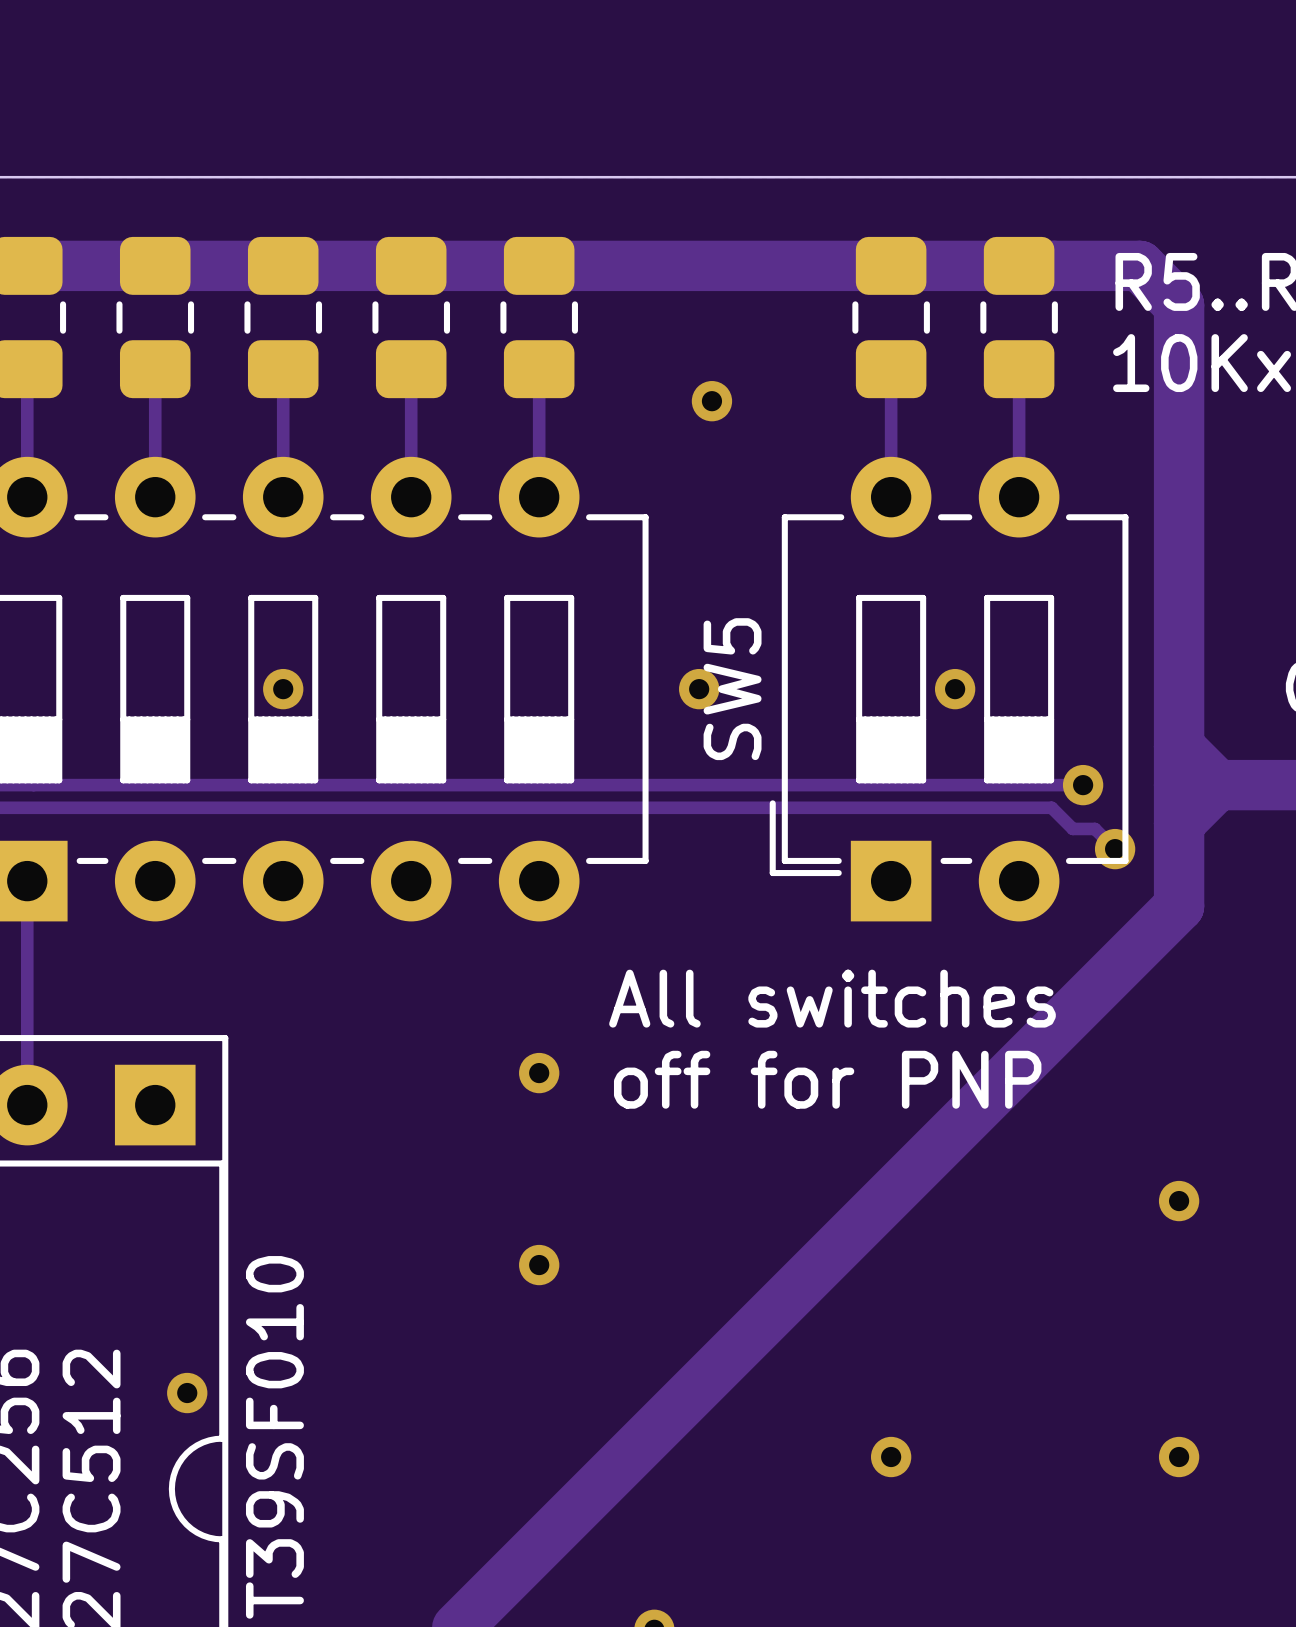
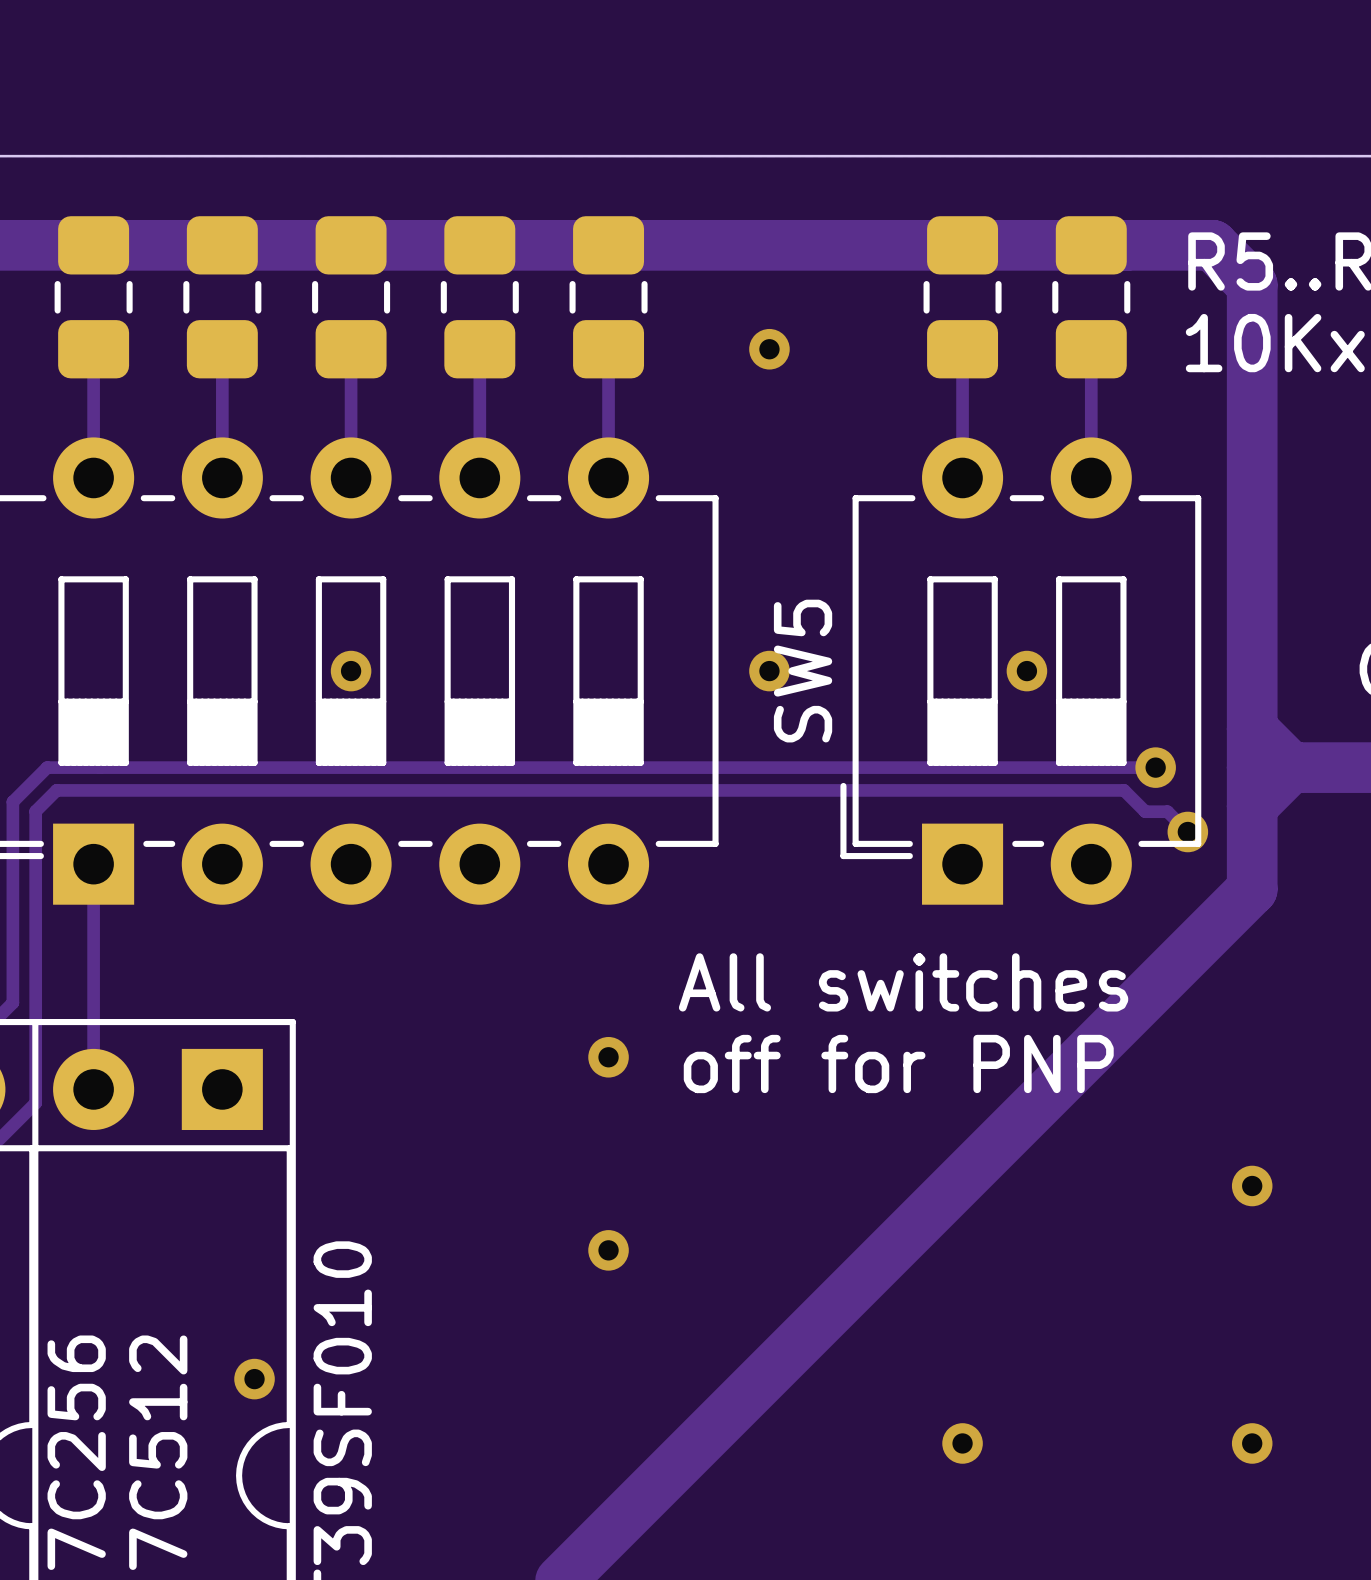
via position: (711, 401) -> (769, 349)

